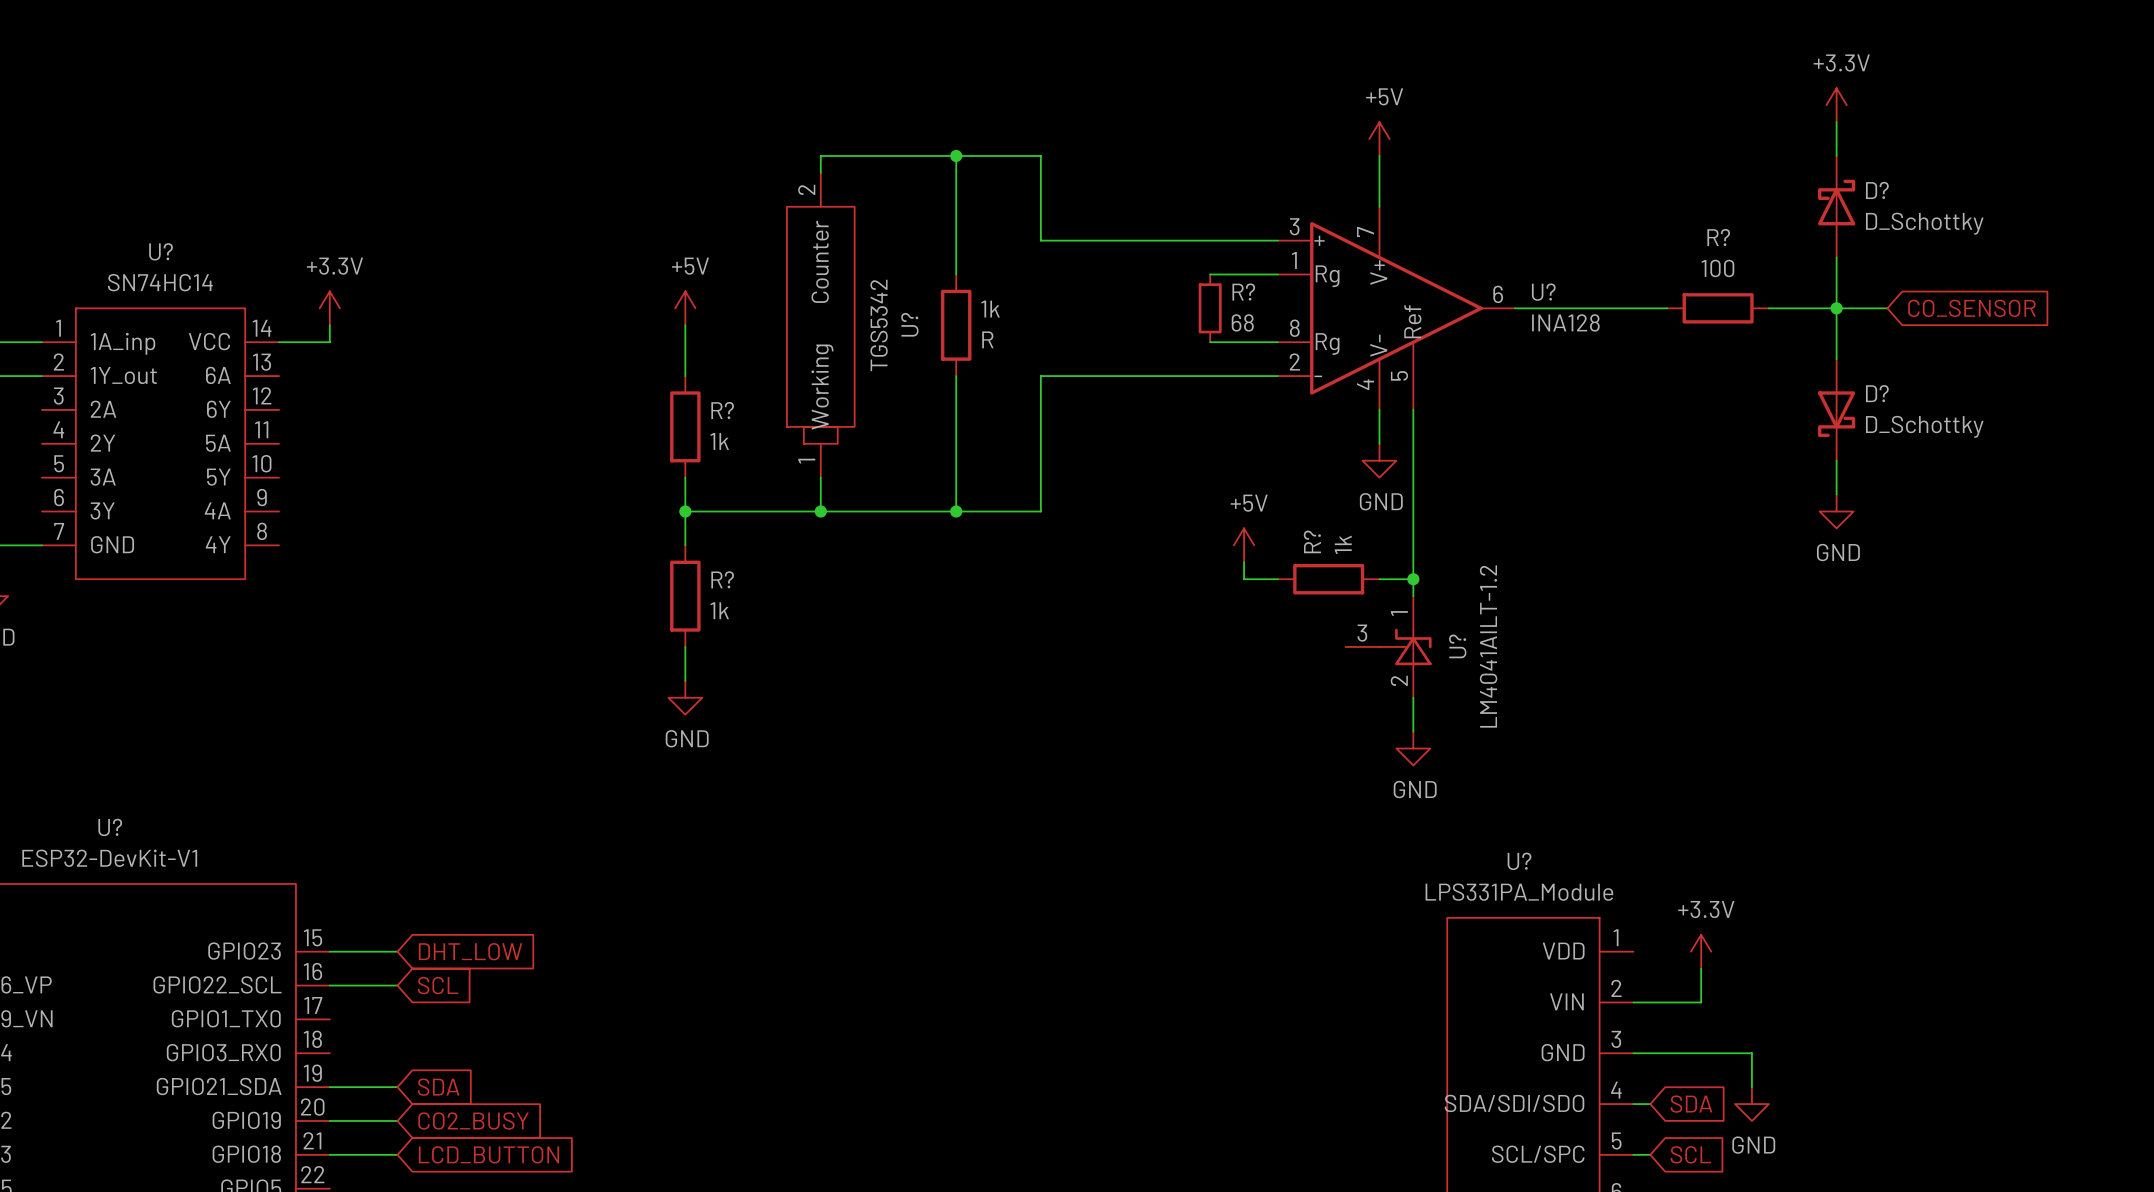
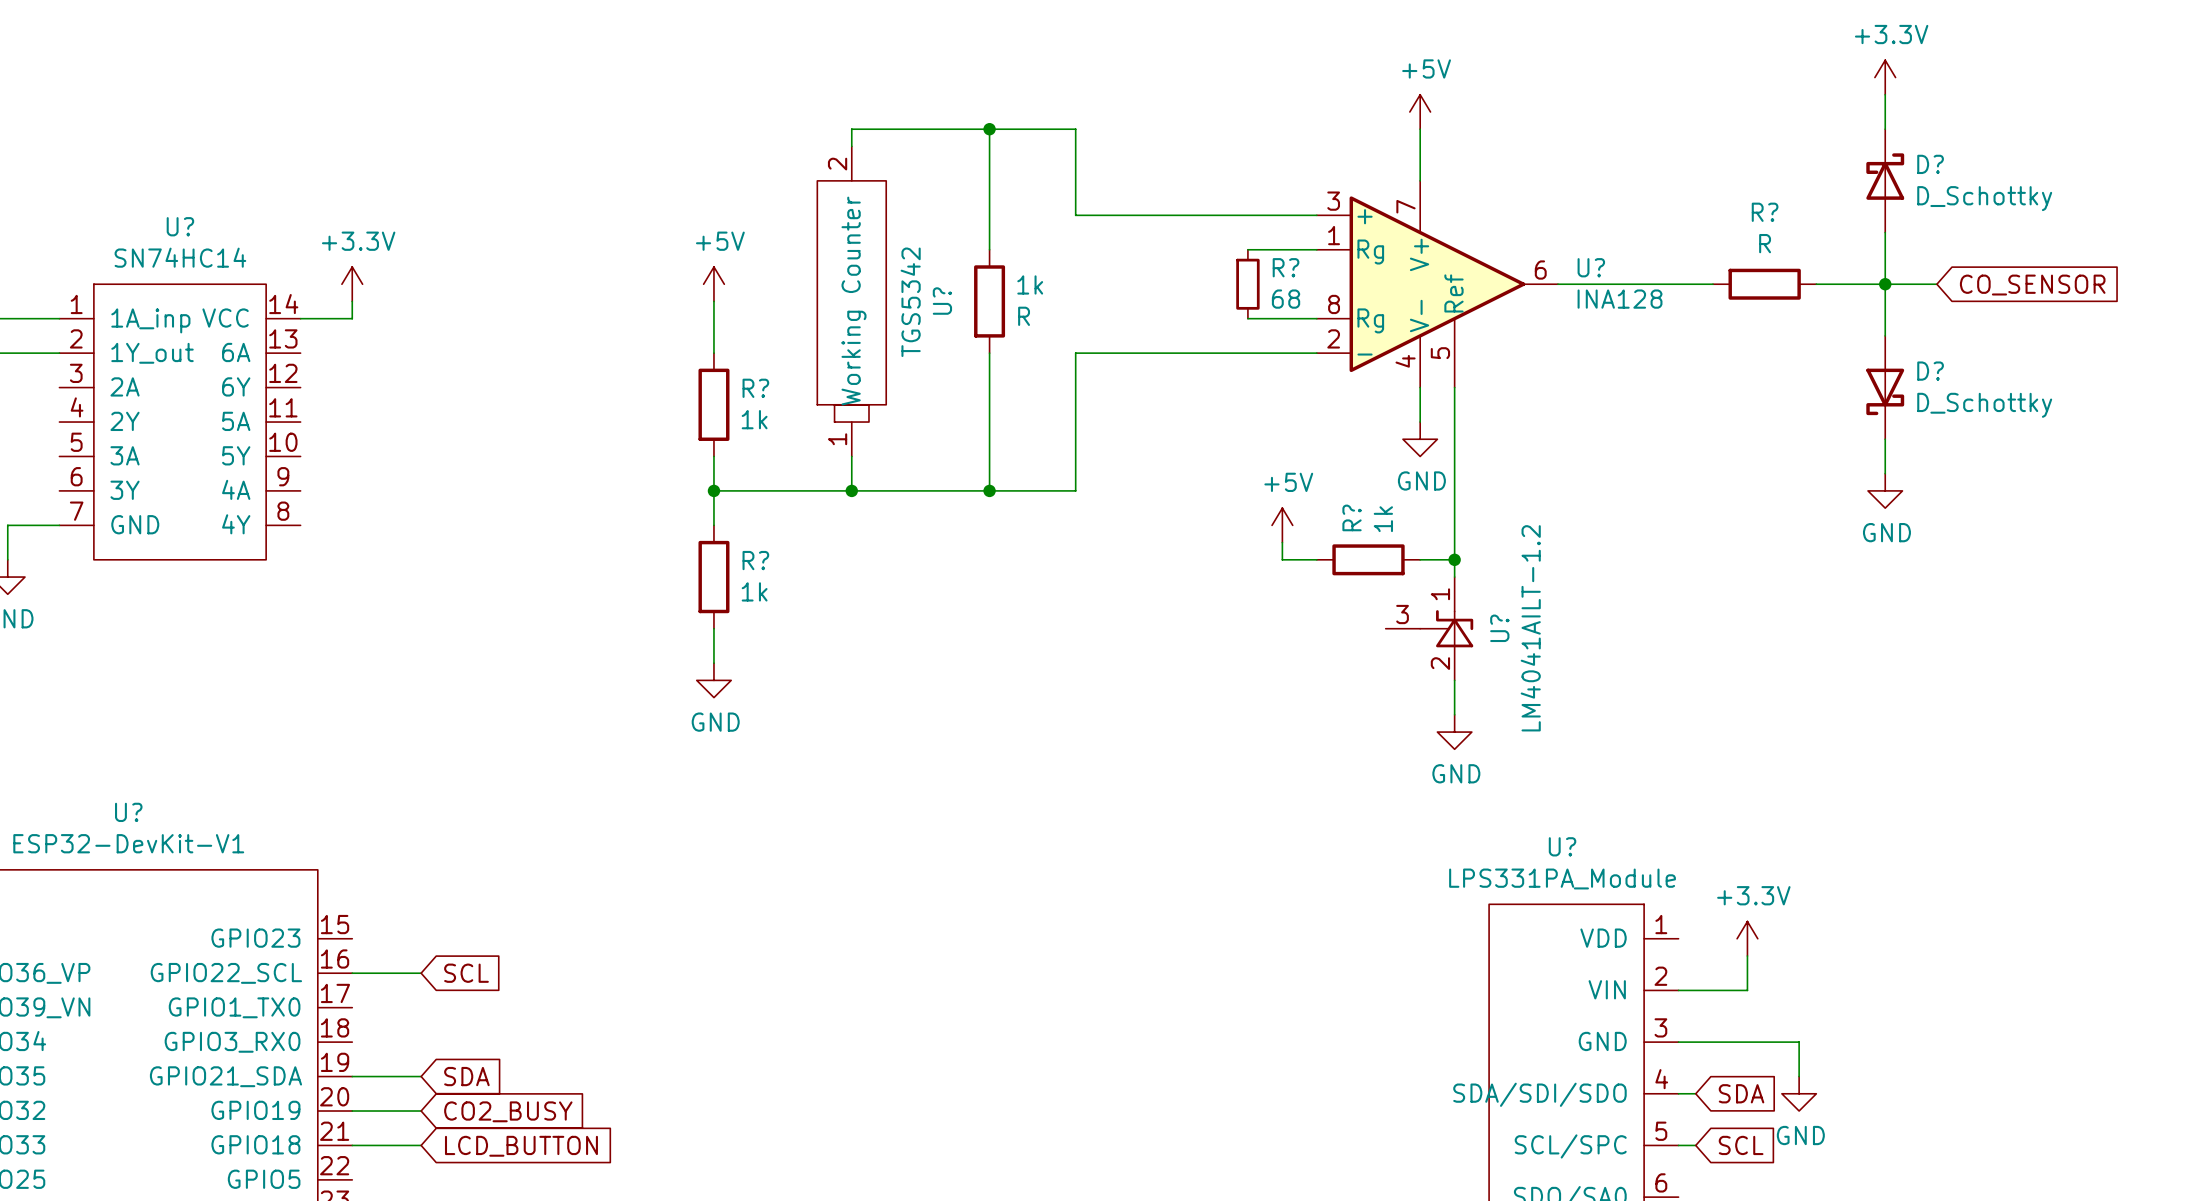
R? value: 100 (1717, 268) -> R (1765, 243)
wire: (329, 951) (397, 951) -> none
global label: DHT_LOW (470, 951) -> none

